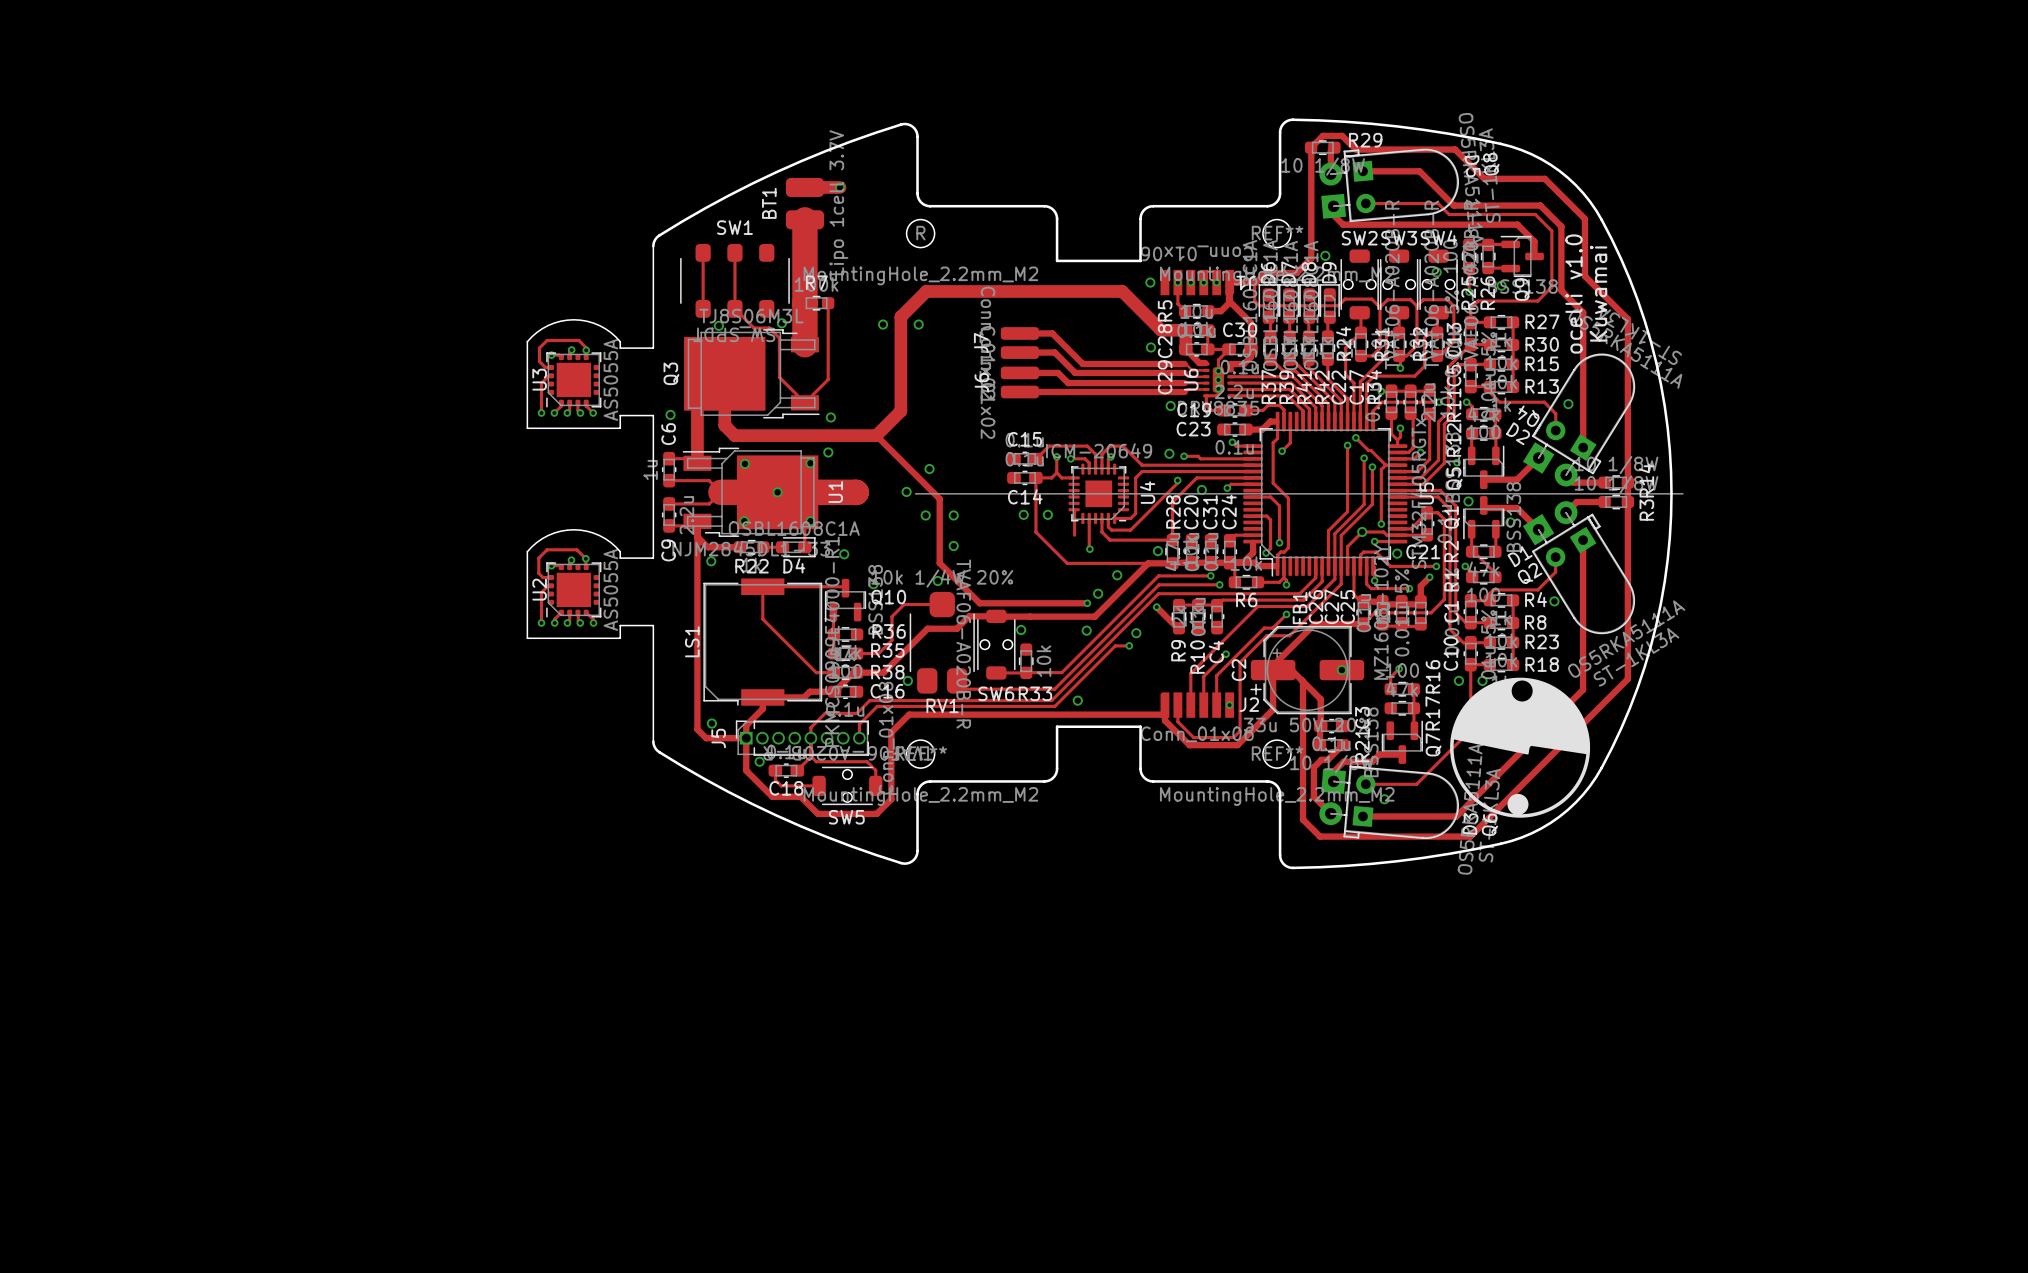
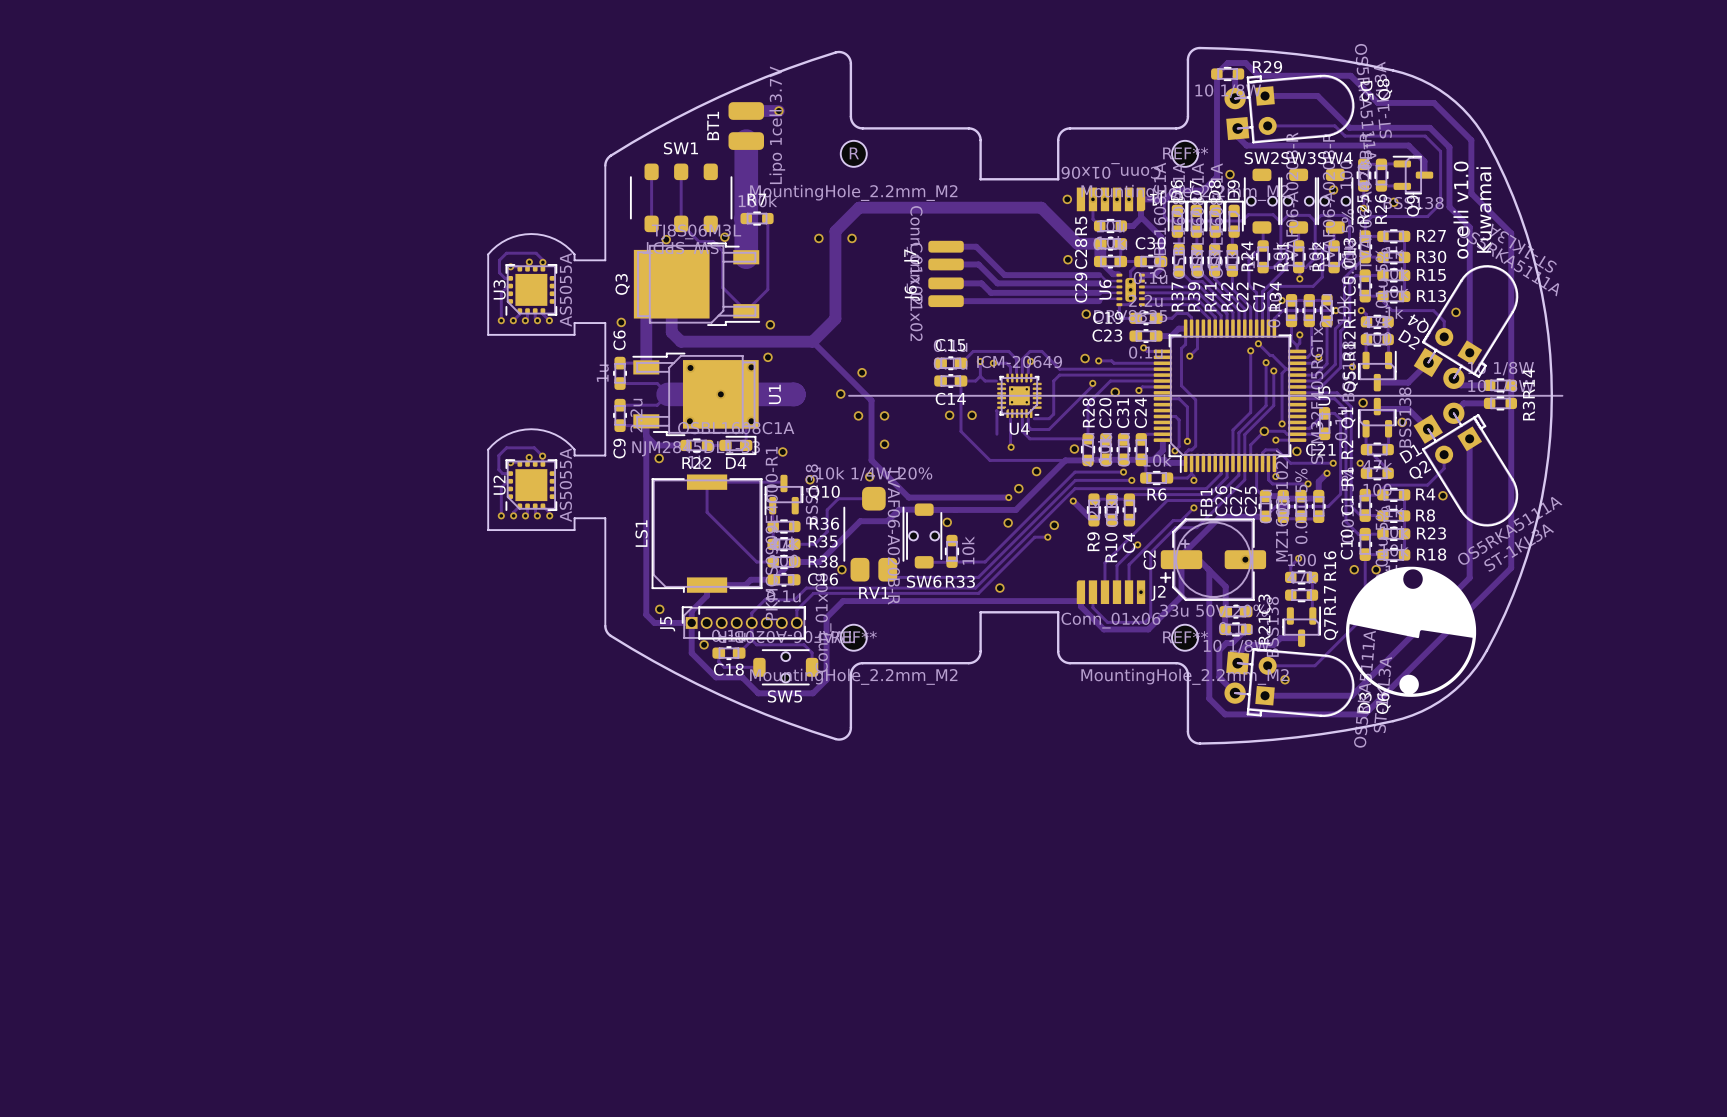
U4 footprint: [1068, 463, 1130, 525] -> [997, 373, 1042, 418]
U4 name position: U4 (1147, 492) -> U4 (1019, 428)

